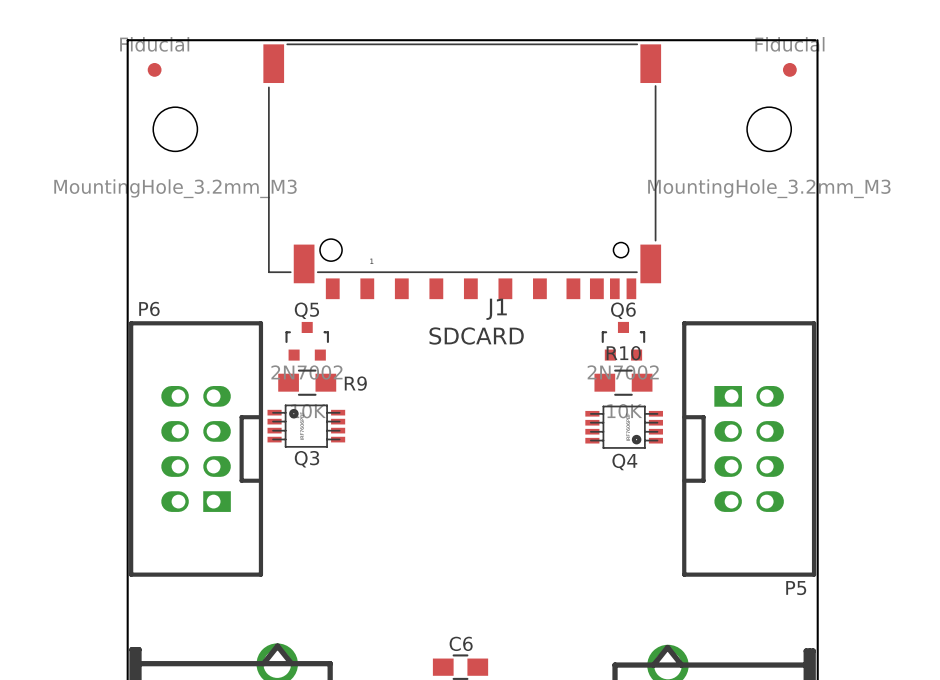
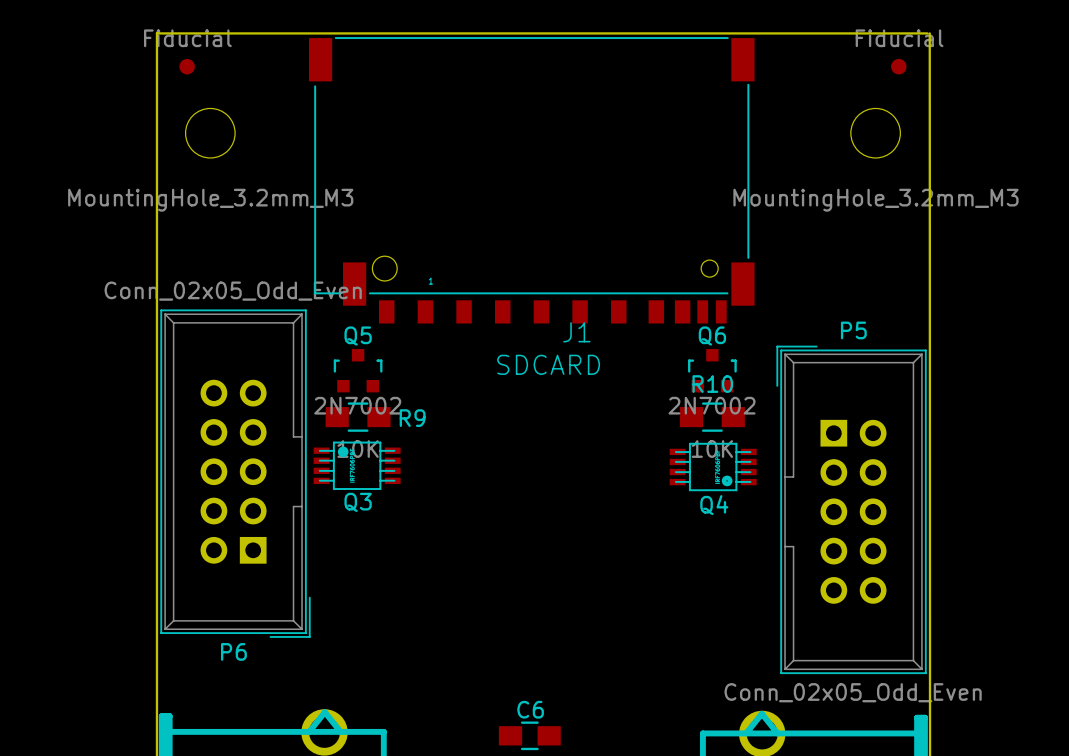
P6 value: none -> Conn_02x05_Odd_Even (233, 291)
P6 name position: P6 (149, 308) -> P6 (233, 651)
P6 footprint: [129, 321, 264, 577] -> [160, 309, 311, 638]
P5 footprint: [682, 321, 817, 577] -> [776, 345, 927, 675]
P5 name position: P5 (796, 588) -> P5 (853, 330)
P5 value: none -> Conn_02x05_Odd_Even (853, 692)

